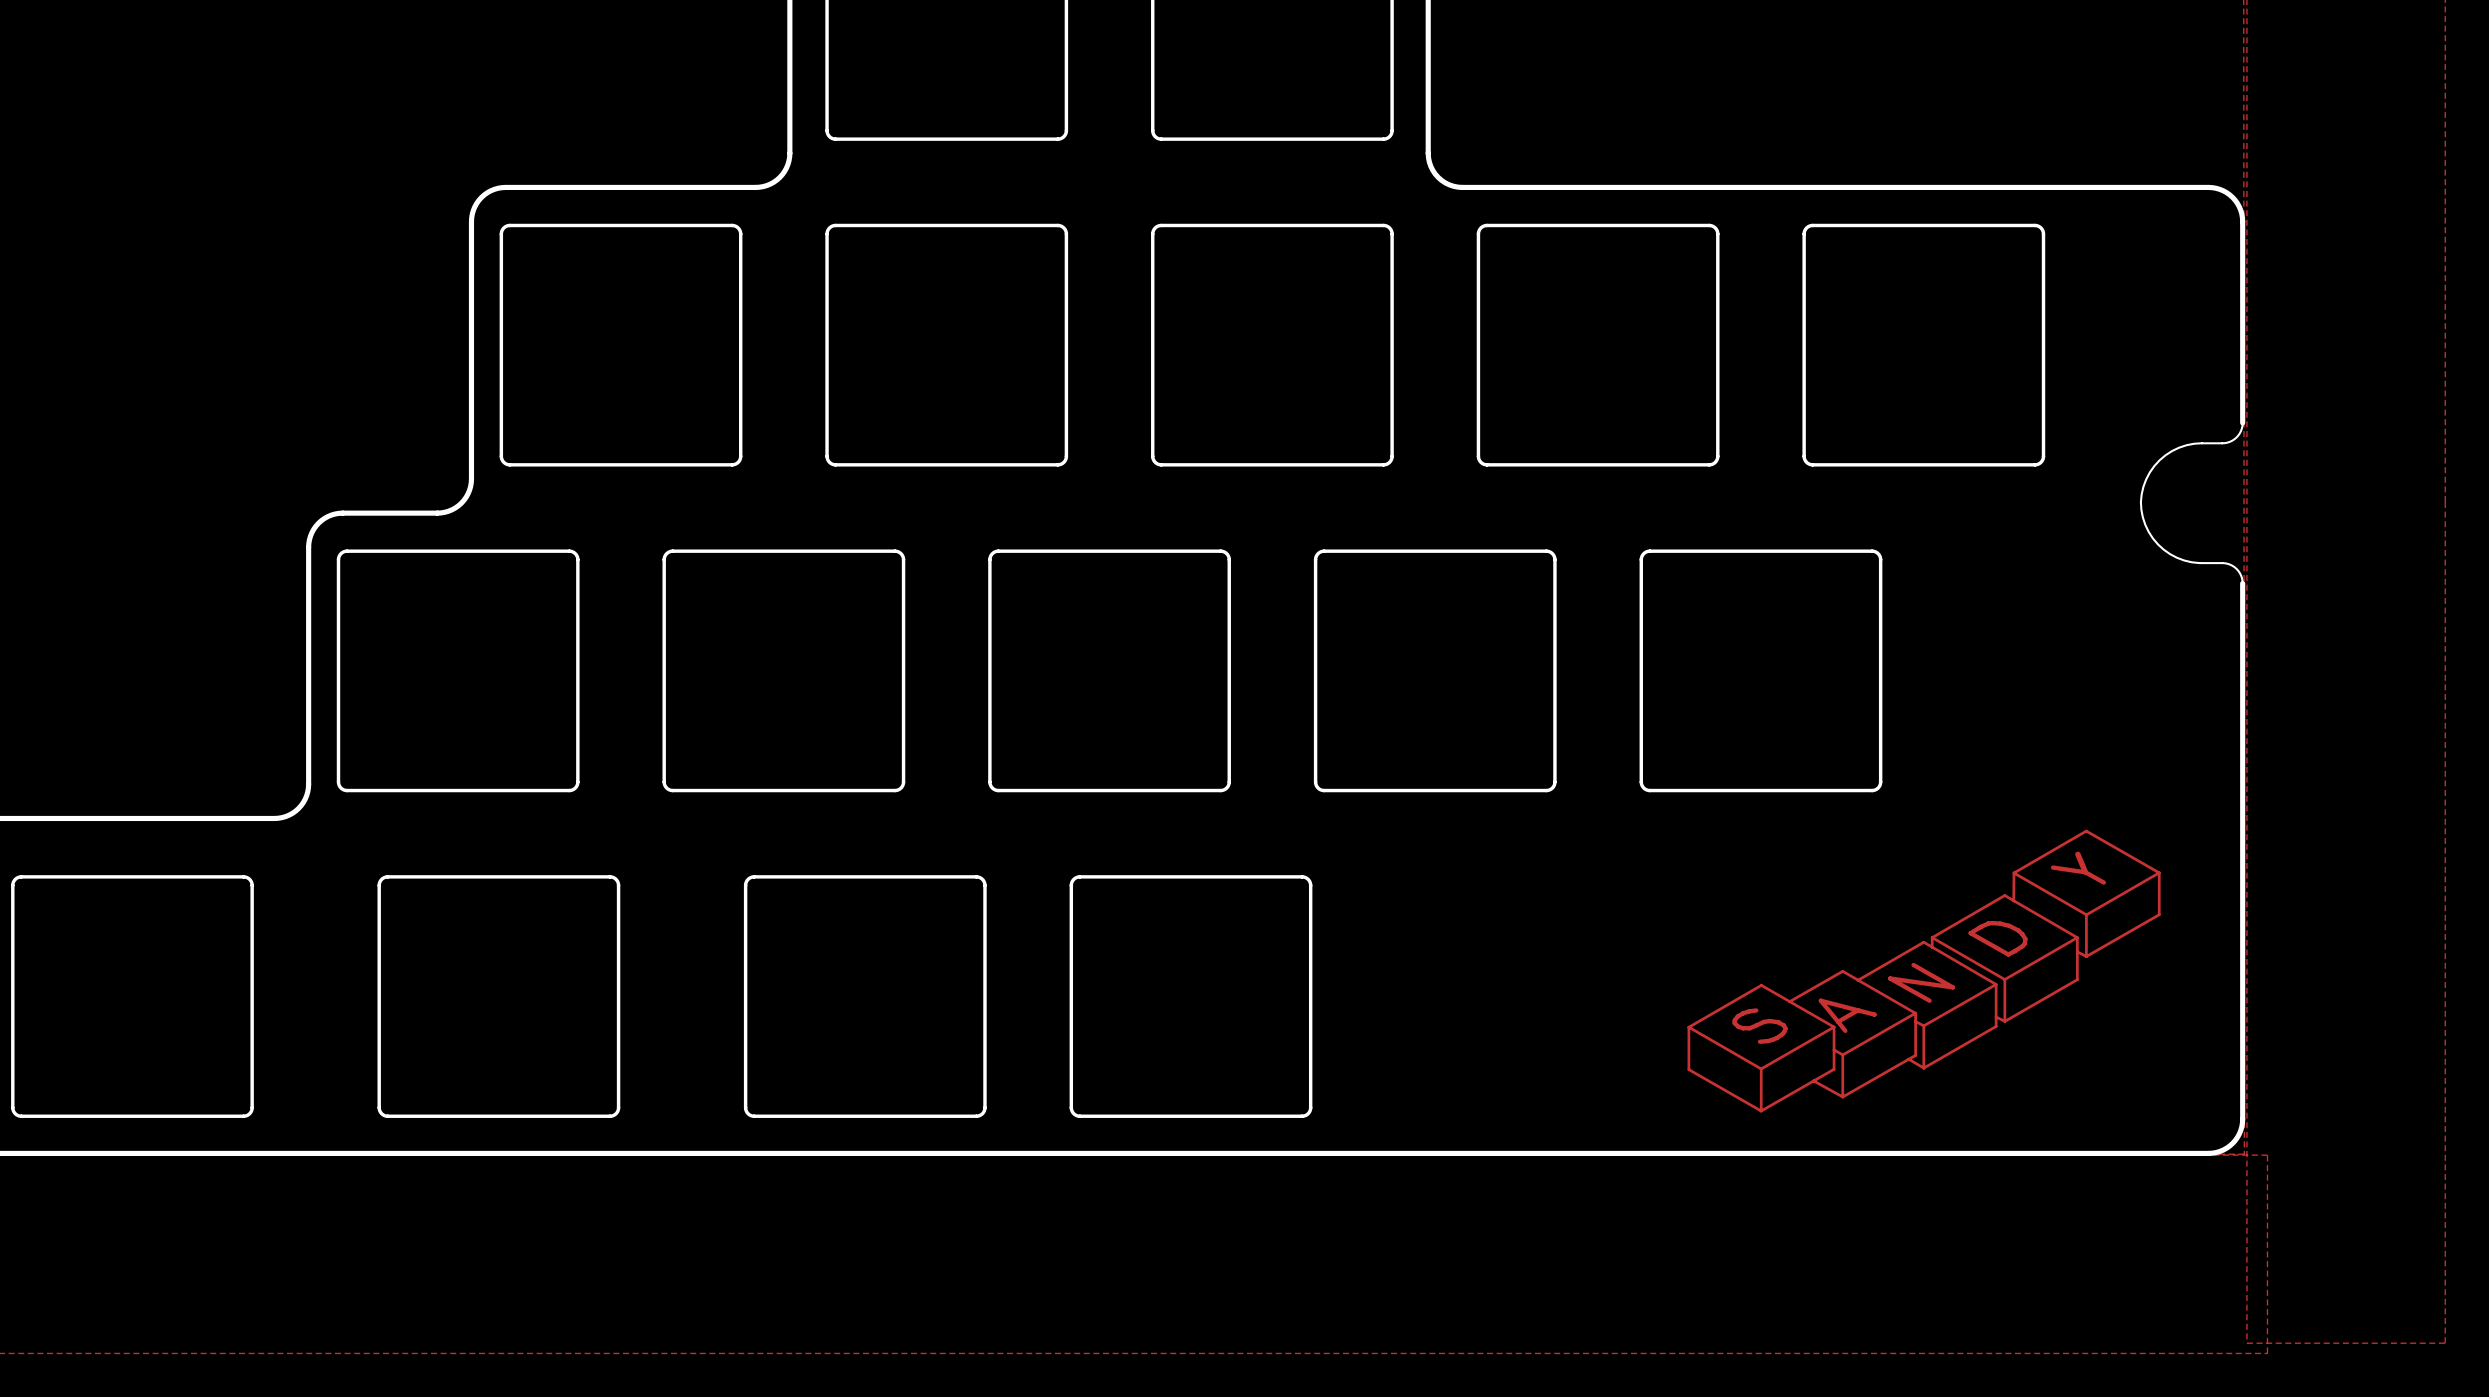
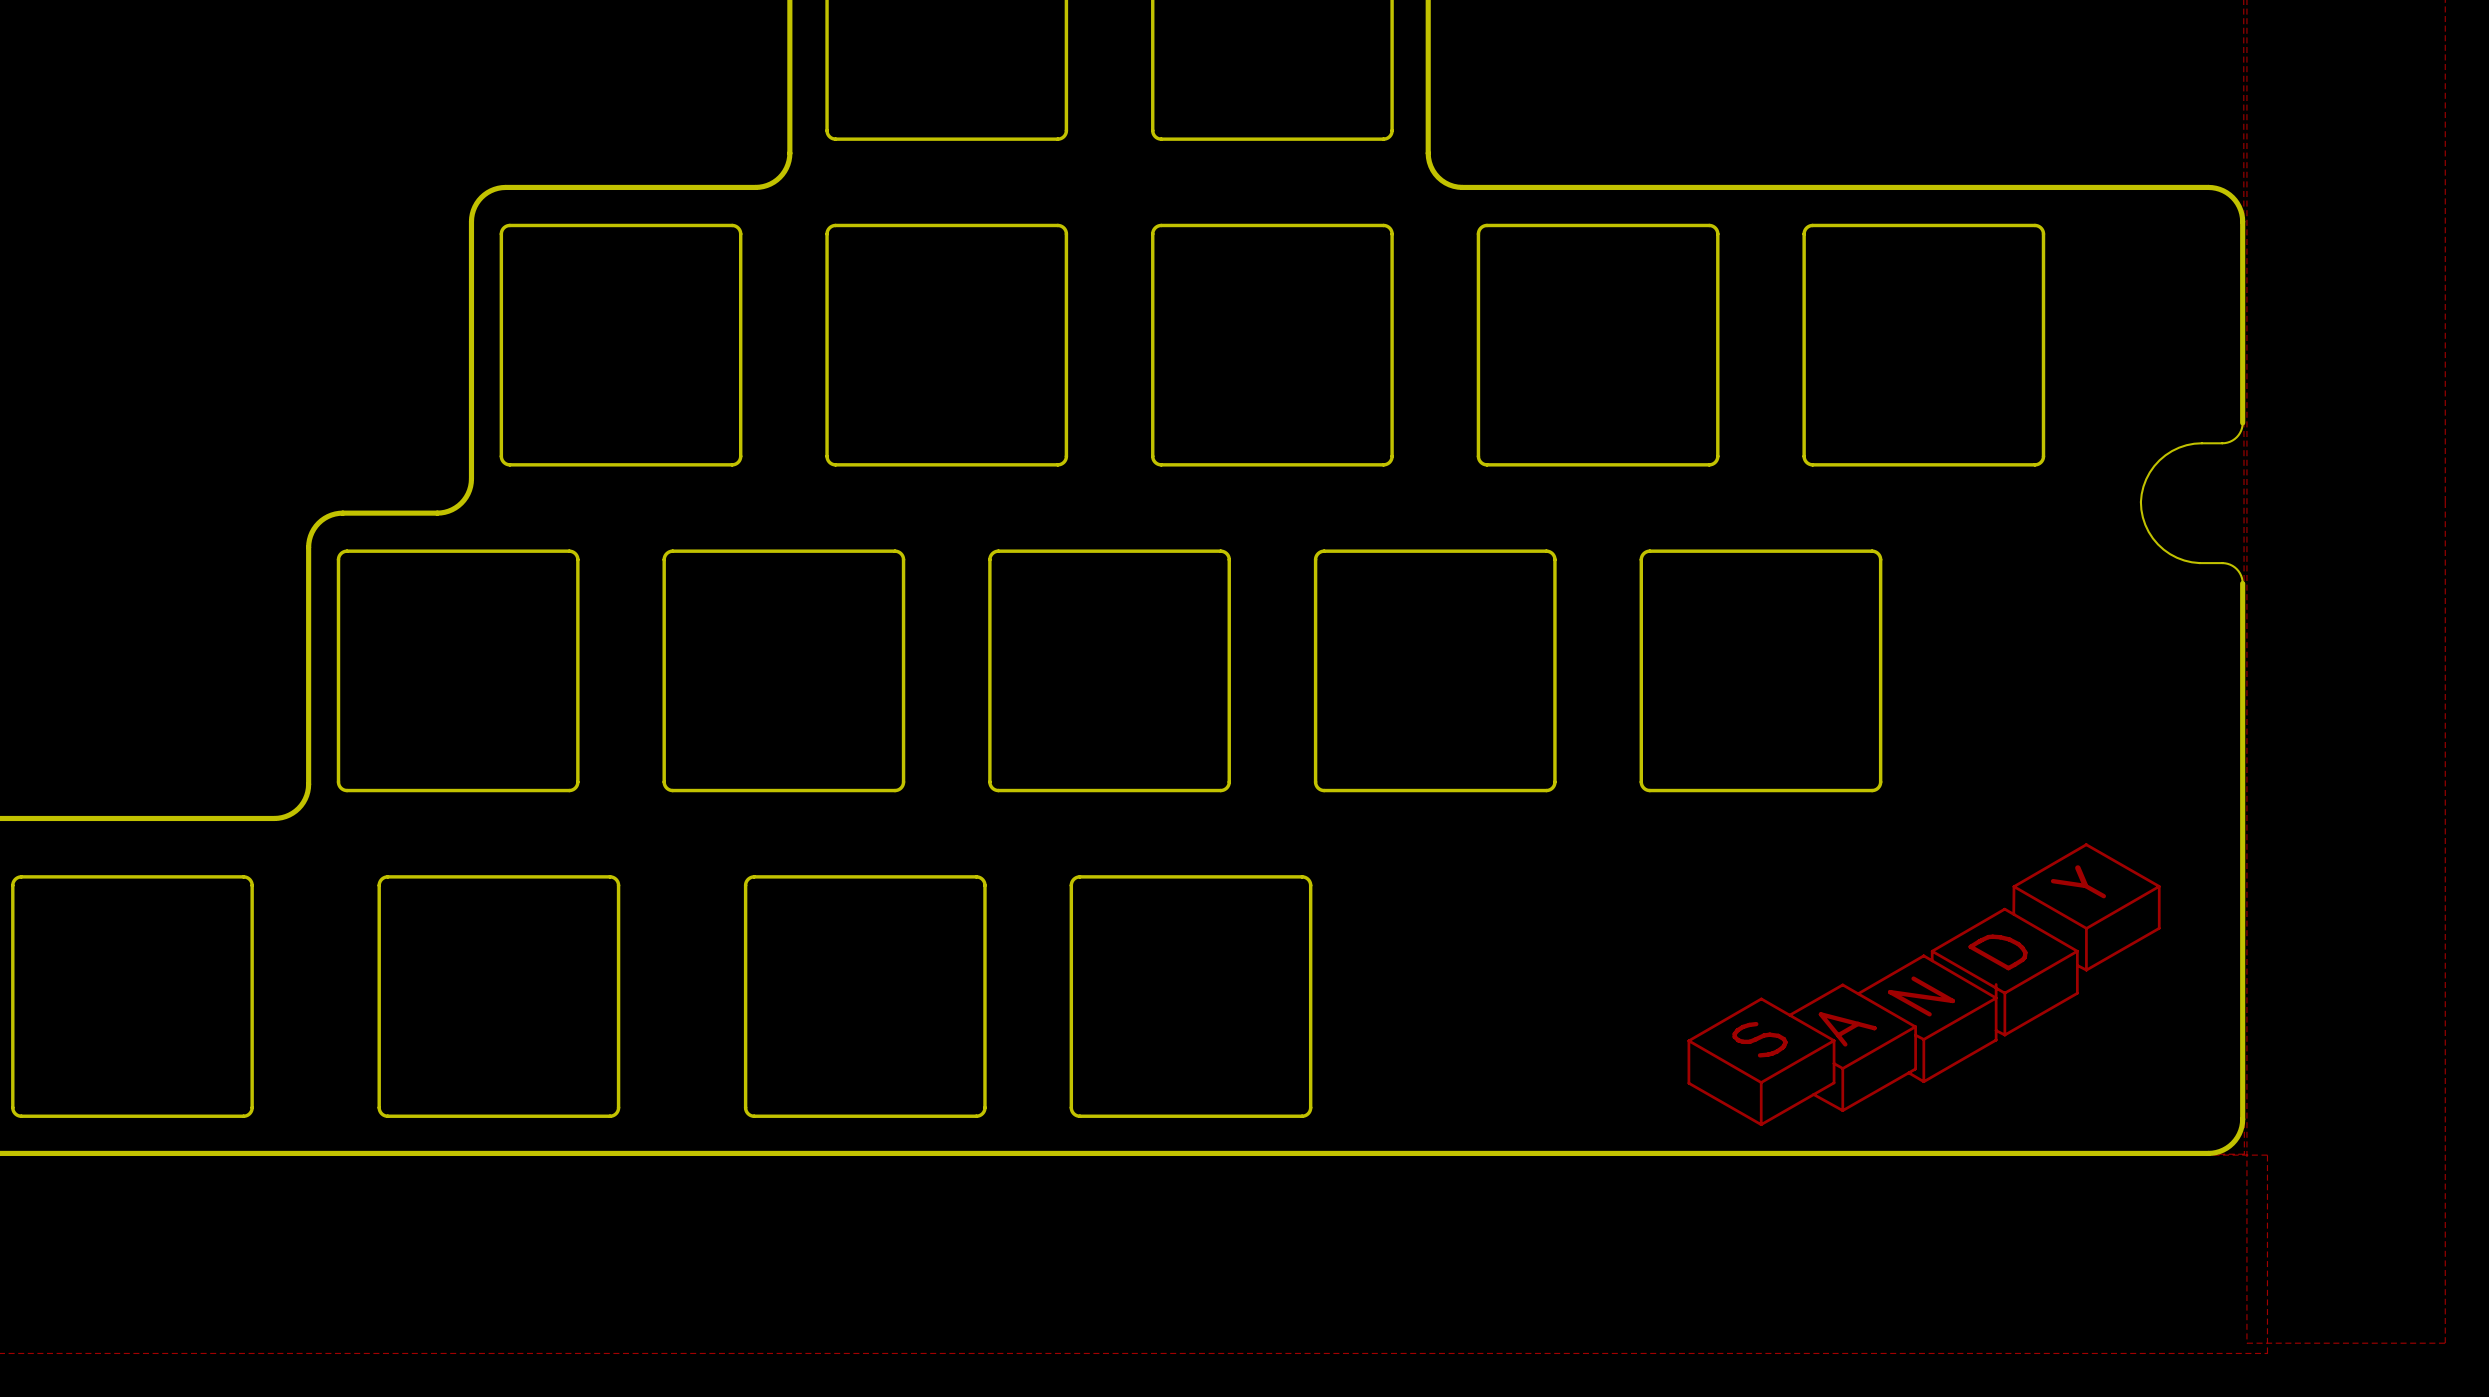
track: (2086, 831) (2159, 872) (2159, 886) -> (2086, 844) (2159, 886)
track: (2086, 831) (2014, 873) -> (2086, 844) (2014, 886)
track: (2077, 854) (2085, 872) -> (2077, 867) (2085, 885)
track: (2053, 867) (2085, 872) -> (2053, 881) (2085, 885)
track: (2085, 872) (2103, 882) -> (2085, 885) (2103, 896)
track: (2014, 873) (2014, 900) -> (2014, 886) (2014, 914)
track: (2014, 873) (2086, 914) -> (2014, 886) (2086, 928)
track: (2158, 873) (2086, 914) (2086, 928) -> (2158, 886) (2086, 928)
track: (2004, 895) (1932, 937) -> (2004, 909) (1932, 951)
track: (2004, 895) (2077, 937) -> none
track: none -> (2004, 909) (2077, 951) (2004, 993) (1932, 951)
track: (2159, 914) (2086, 956) -> (2159, 914) (2159, 928) (2086, 969)
track: (2022, 934) (2025, 939) (2024, 943) (2008, 954) (1970, 933) (1992, 923) (2009, 925) (2022, 934) -> (2022, 947) (2025, 952) (2024, 957) (2008, 968) (1970, 946) (1992, 936) (2009, 939) (2022, 947)
track: (1932, 937) (1932, 947) -> (1932, 951) (1932, 960)
track: (1932, 937) (2004, 979) -> none
track: (2077, 937) (2004, 979) -> (1995, 1040) (1923, 1081)
track: (2077, 937) (2077, 951) -> none
track: (2077, 951) (2086, 956) -> (2077, 965) (2086, 970) (2086, 956)
track: (1913, 965) (1952, 987) (1890, 978) (1929, 1000) -> (1913, 978) (1952, 1001) (1890, 992) (1929, 1014)
track: (2004, 979) (2004, 993) -> (2004, 1021) (2004, 1035)
track: (2077, 979) (2004, 1021) (1996, 1016) -> (2077, 979) (2077, 993) (2004, 1035)
track: (1858, 980) (1923, 942) (1996, 984) (1923, 1025) -> none
track: none -> (1858, 993) (1923, 955) (1996, 998) (1923, 1039) (1915, 1035)
track: none -> (1761, 998) (1834, 1040) (1761, 1082) (1688, 1040) (1761, 998)
track: (1789, 1001) (1842, 971) (1915, 1013) (1842, 1054) (1842, 1068) -> (1789, 1015) (1842, 984) (1915, 1026) (1842, 1068)
track: (1756, 1010) (1742, 1013) (1737, 1016) (1734, 1023) (1738, 1026) (1749, 1028) (1769, 1021) (1778, 1022) (1785, 1028) (1776, 1038) (1760, 1041) -> (1756, 1024) (1742, 1026) (1737, 1030) (1734, 1036) (1738, 1040) (1749, 1041) (1769, 1034) (1778, 1035) (1785, 1042) (1776, 1051) (1760, 1055)
track: (1857, 1010) (1838, 1021) -> (1857, 1023) (1838, 1035)
track: (1915, 1013) (1915, 1026) -> none
track: (1874, 1014) (1820, 1000) (1838, 1021) -> (1874, 1028) (1820, 1014) (1838, 1035)
track: (1838, 1021) (1845, 1030) -> (1838, 1035) (1845, 1044)
track: (1915, 1021) (1923, 1025) -> none
track: (1923, 1025) (1923, 1039) -> (1923, 1068) (1923, 1081)
track: (1995, 1026) (1923, 1068) (1908, 1059) -> (1996, 1026) (1996, 1039)
track: (1688, 1027) (1761, 1068) -> none
track: (1688, 1027) (1688, 1040) -> none
track: (1834, 1027) (1834, 1040) -> (1842, 1096) (1842, 1110)
track: (1834, 1027) (1761, 1068) -> (1915, 1069) (1842, 1110)
track: (1834, 1027) (1761, 985) (1688, 1027) -> none
track: none -> (1996, 1030) (2004, 1035)
track: (1834, 1049) (1842, 1054) -> (1834, 1063) (1842, 1068)
track: (1915, 1055) (1842, 1096) (1813, 1080) -> (1915, 1055) (1915, 1068)
track: (1761, 1068) (1761, 1082) -> (1761, 1111) (1761, 1124)
track: (1834, 1069) (1761, 1111) (1688, 1069) -> (1761, 1124) (1688, 1083) (1688, 1069)
track: none -> (1834, 1069) (1834, 1082) (1813, 1094)
track: none -> (1908, 1072) (1923, 1081)
track: none -> (1813, 1094) (1842, 1110)
track: none -> (1813, 1094) (1761, 1124)

